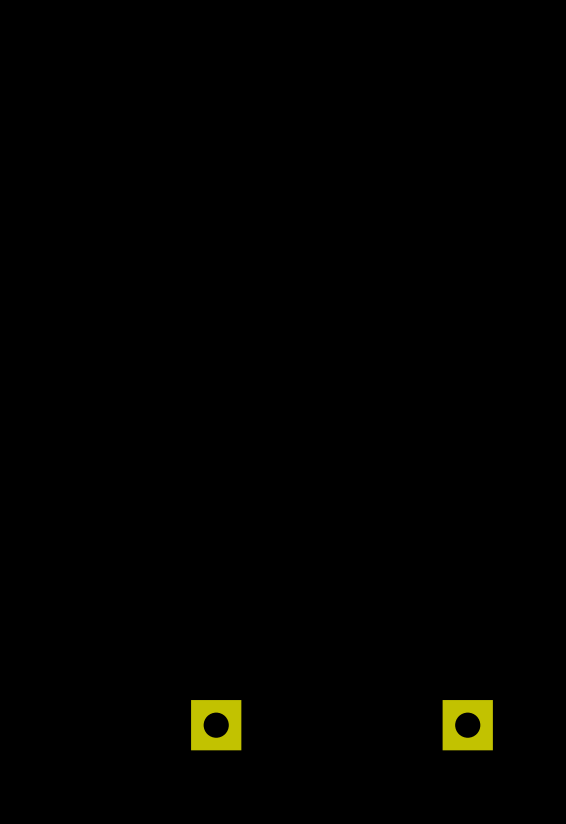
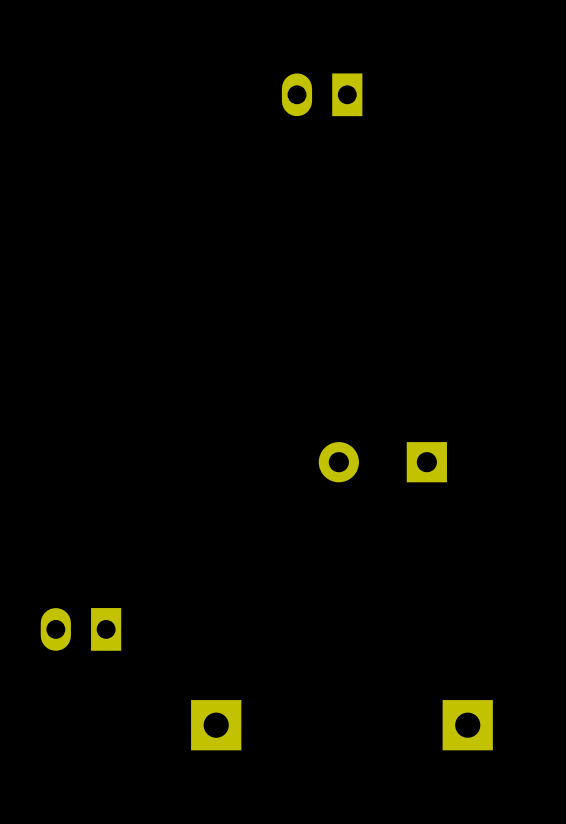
part: none -> (322, 94)
part: none -> (382, 462)
part: none -> (80, 629)

